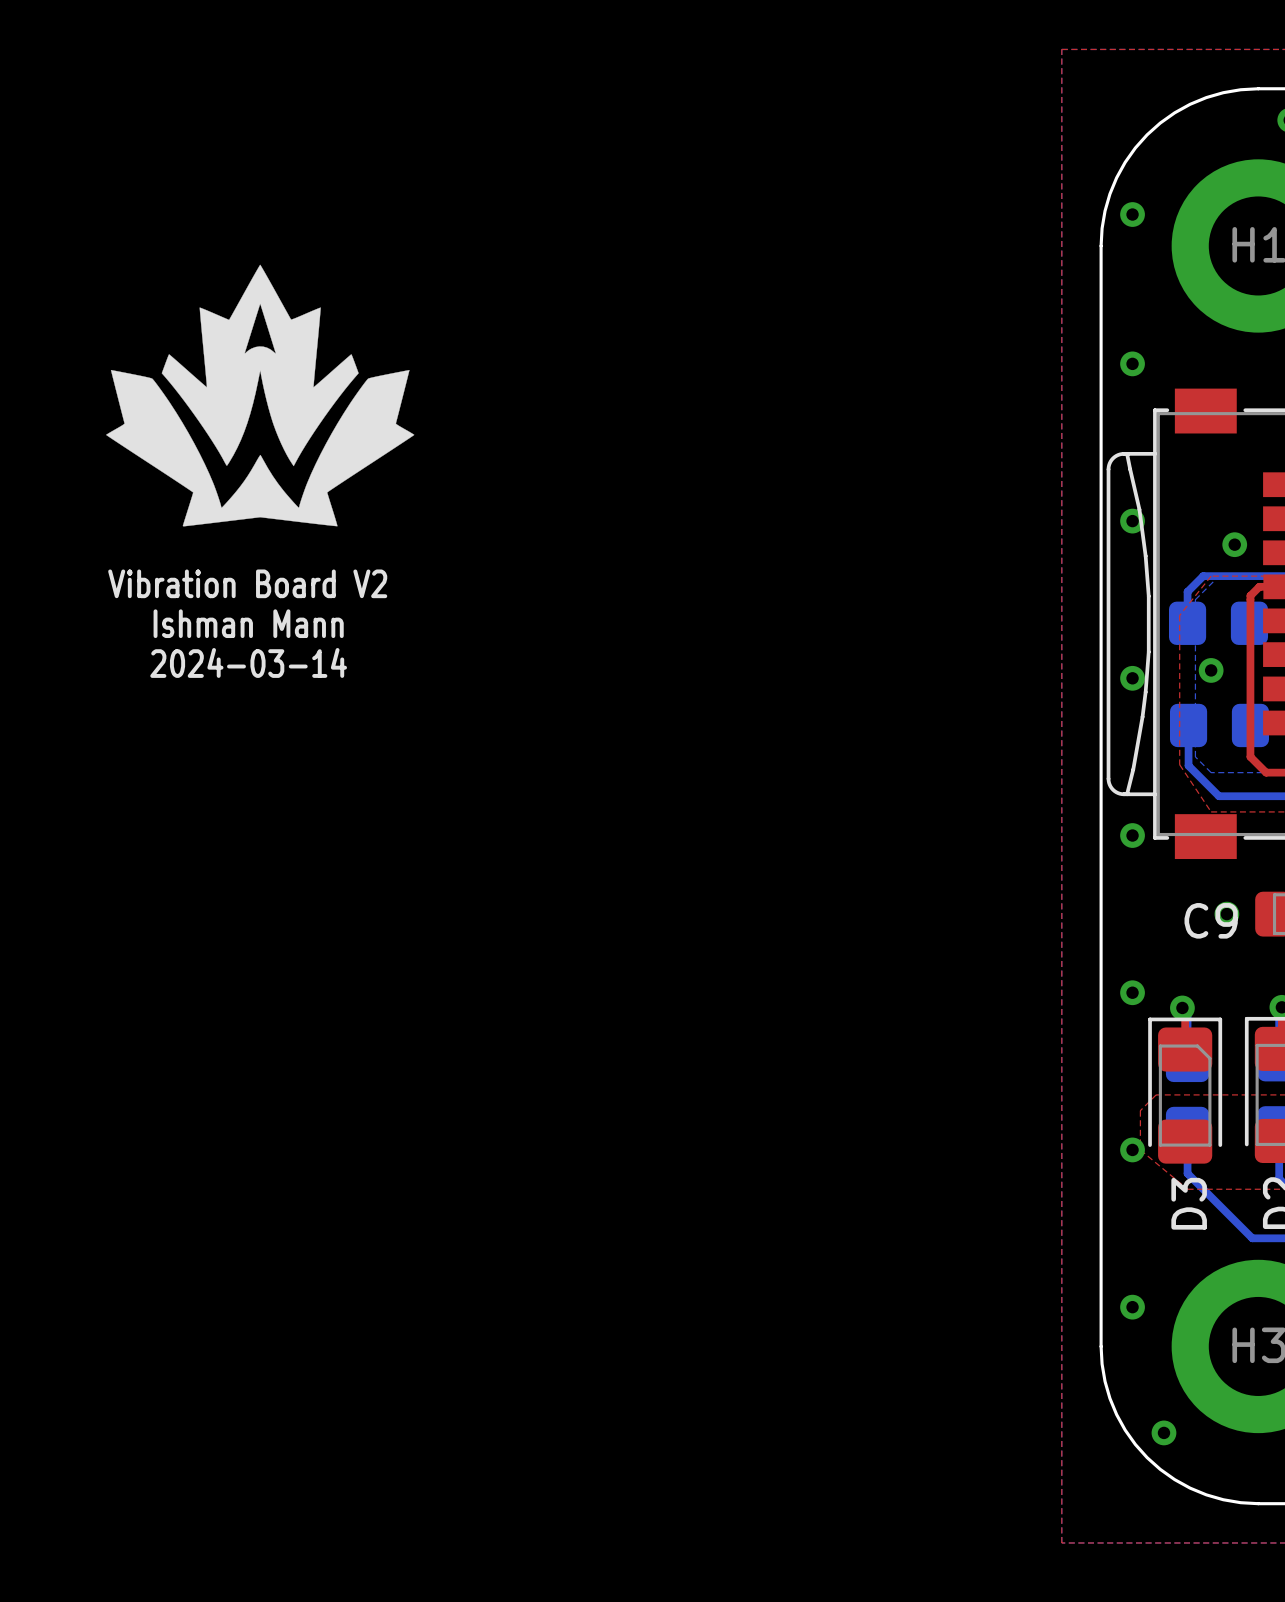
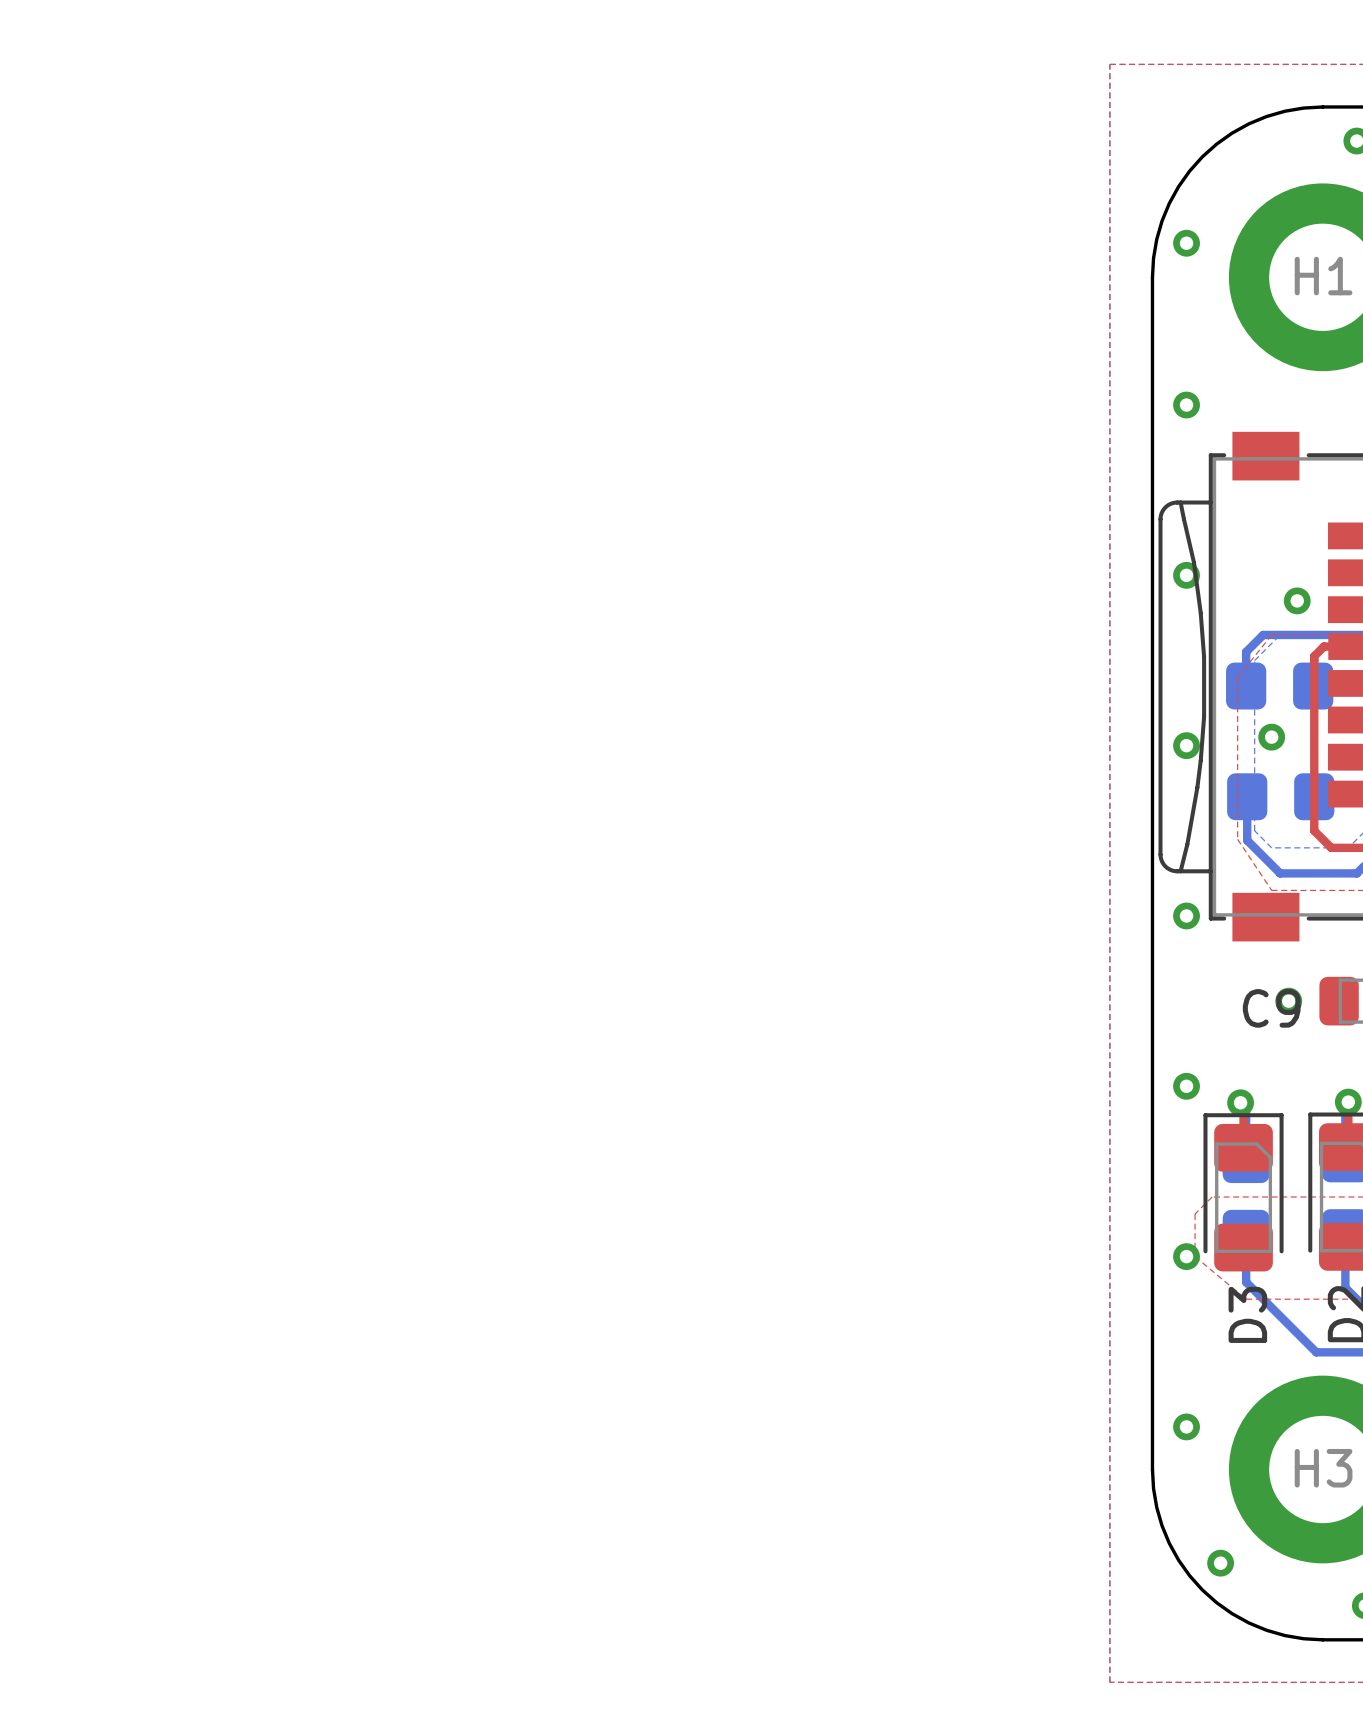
drawing: [106, 264, 415, 527] -> none
text: Vibration Board V2 (247, 583) -> none
text: Ishman Mann (248, 623) -> none
text: 2024-03-14 (248, 662) -> none

